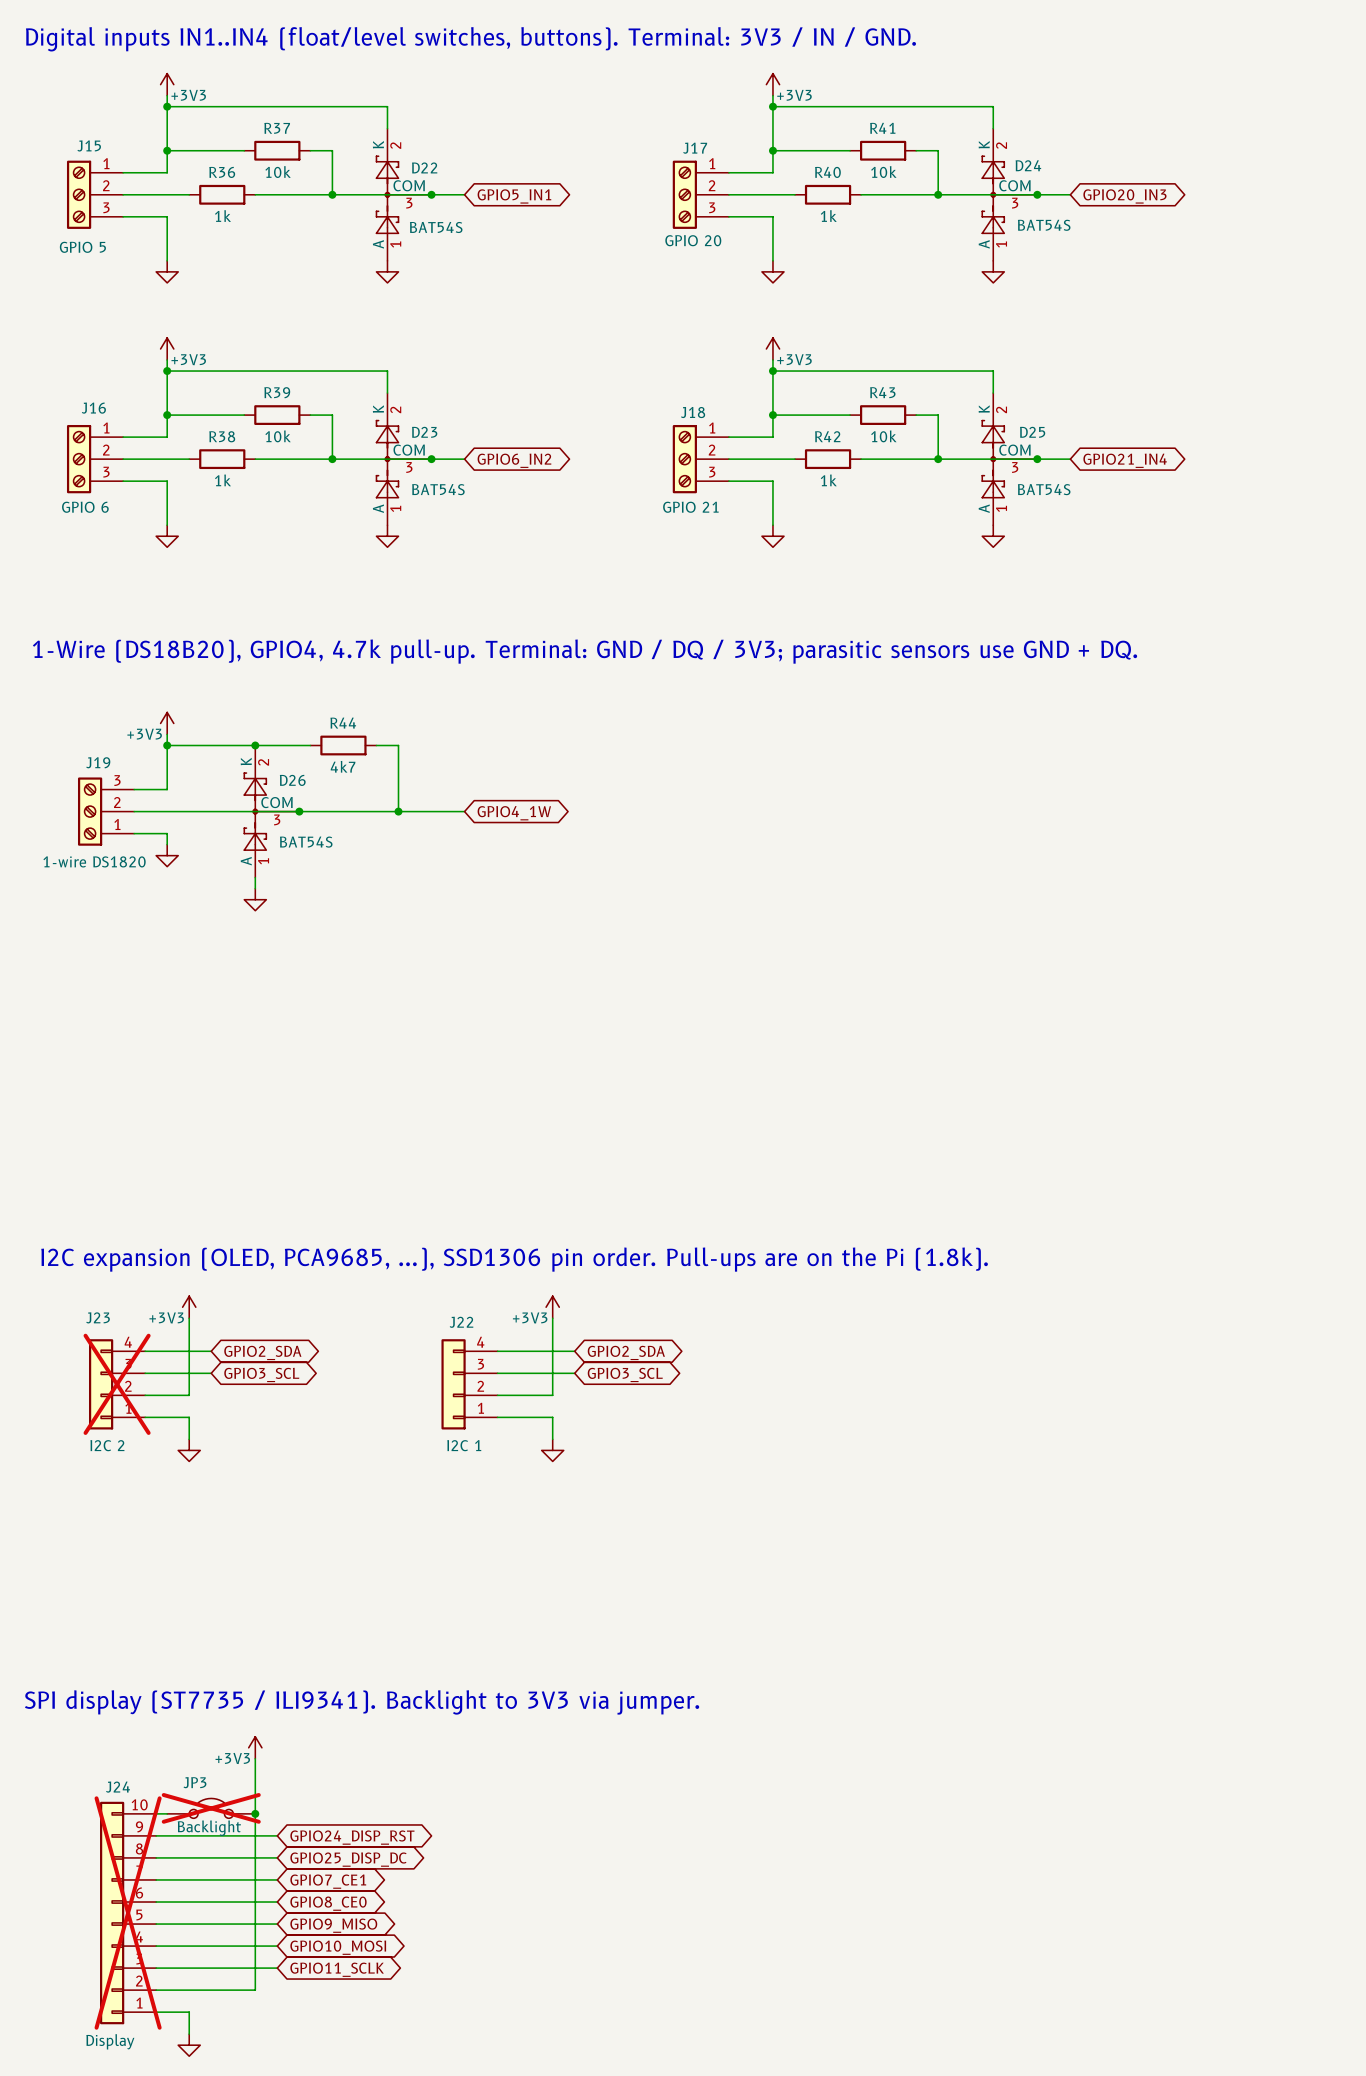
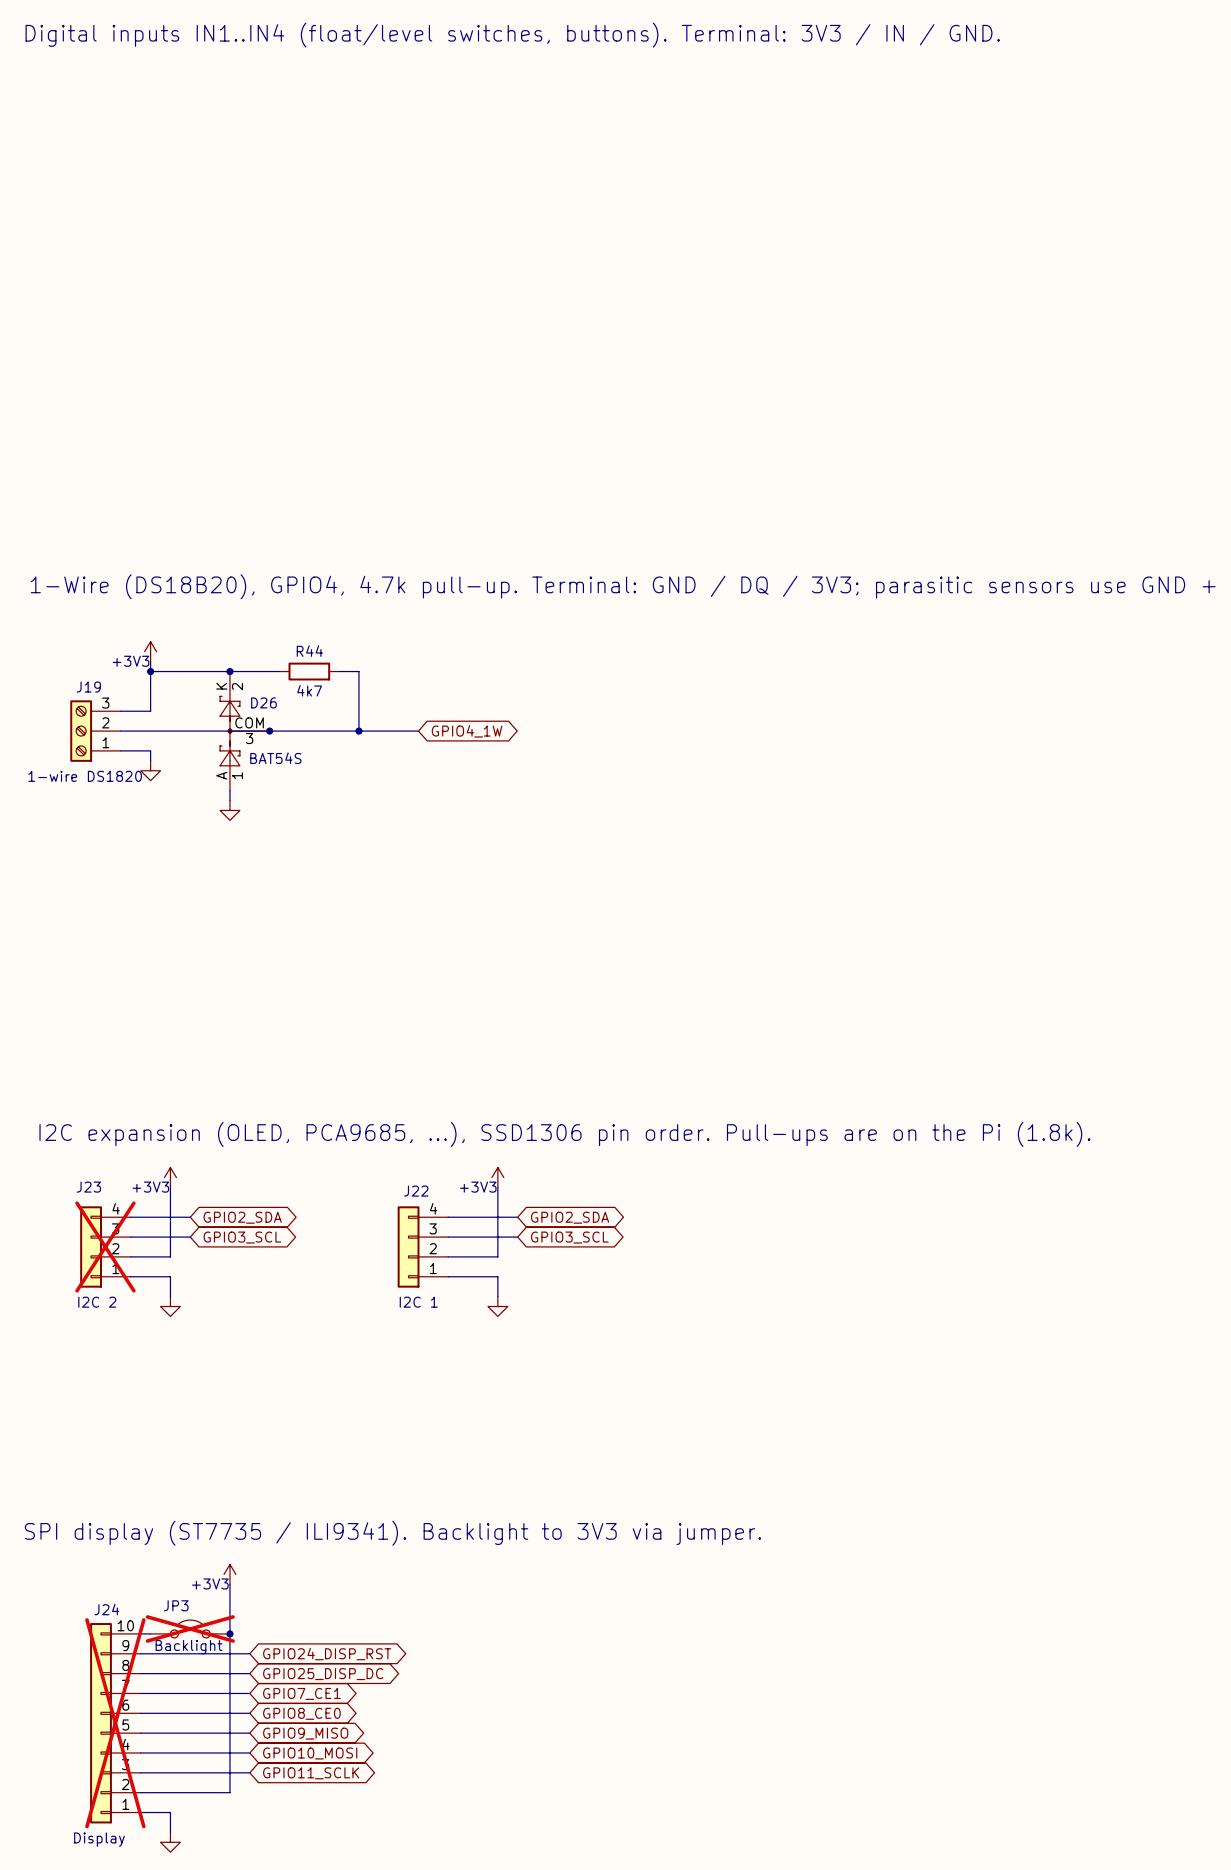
power symbol: +3V3 (167, 84) -> none
power symbol: +3V3 (772, 84) -> none
wire: (167, 95) (167, 172) (123, 172) -> none
wire: (772, 95) (772, 172) (728, 172) -> none
wire: (167, 106) (387, 106) (387, 128) -> none
junction: (167, 106) -> none
wire: (772, 106) (993, 106) (993, 128) -> none
junction: (772, 106) -> none
wire: (167, 150) (244, 150) -> none
junction: (167, 150) -> none
R37: 10k (277, 150) -> none
wire: (310, 150) (332, 150) (332, 194) -> none
wire: (772, 150) (850, 150) -> none
junction: (772, 150) -> none
R41: 10k (883, 150) -> none
wire: (916, 150) (938, 150) (938, 194) -> none
J15: GPIO 5 (95, 194) -> none
wire: (123, 194) (189, 194) -> none
R36: 1k (222, 194) -> none
wire: (255, 194) (464, 194) -> none
junction: (332, 194) -> none
D22: BAT54S (404, 194) -> none
junction: (431, 194) -> none
J17: GPIO 20 (700, 194) -> none
wire: (728, 194) (795, 194) -> none
R40: 1k (828, 194) -> none
wire: (861, 194) (1070, 194) -> none
junction: (938, 194) -> none
D24: BAT54S (1009, 194) -> none
junction: (1037, 194) -> none
global label: GPIO5_IN1 (514, 196) -> none
global label: GPIO20_IN3 (1124, 196) -> none
wire: (123, 216) (167, 216) (167, 260) -> none
wire: (728, 216) (772, 216) (772, 260) -> none
power symbol: (167, 271) -> none
power symbol: (387, 271) -> none
power symbol: (772, 271) -> none
power symbol: (993, 271) -> none
power symbol: +3V3 (167, 348) -> none
power symbol: +3V3 (772, 348) -> none
wire: (167, 360) (167, 437) (123, 437) -> none
wire: (772, 360) (772, 437) (728, 437) -> none
wire: (167, 371) (387, 371) (387, 393) -> none
junction: (167, 371) -> none
wire: (772, 371) (993, 371) (993, 393) -> none
junction: (772, 371) -> none
wire: (167, 415) (244, 415) -> none
junction: (167, 415) -> none
R39: 10k (277, 415) -> none
wire: (310, 415) (332, 415) (332, 459) -> none
wire: (772, 415) (850, 415) -> none
junction: (772, 415) -> none
R43: 10k (883, 415) -> none
wire: (916, 415) (938, 415) (938, 459) -> none
J16: GPIO 6 (95, 459) -> none
wire: (123, 459) (189, 459) -> none
R38: 1k (222, 459) -> none
wire: (255, 459) (464, 459) -> none
junction: (332, 459) -> none
D23: BAT54S (404, 459) -> none
junction: (431, 459) -> none
J18: GPIO 21 (700, 459) -> none
wire: (728, 459) (795, 459) -> none
R42: 1k (828, 459) -> none
wire: (861, 459) (1070, 459) -> none
junction: (938, 459) -> none
D25: BAT54S (1009, 459) -> none
junction: (1037, 459) -> none
global label: GPIO6_IN2 (514, 460) -> none
global label: GPIO21_IN4 (1125, 460) -> none
wire: (123, 481) (167, 481) (167, 525) -> none
wire: (728, 481) (772, 481) (772, 525) -> none
power symbol: (167, 536) -> none
power symbol: (387, 536) -> none
power symbol: (772, 536) -> none
power symbol: (993, 536) -> none

